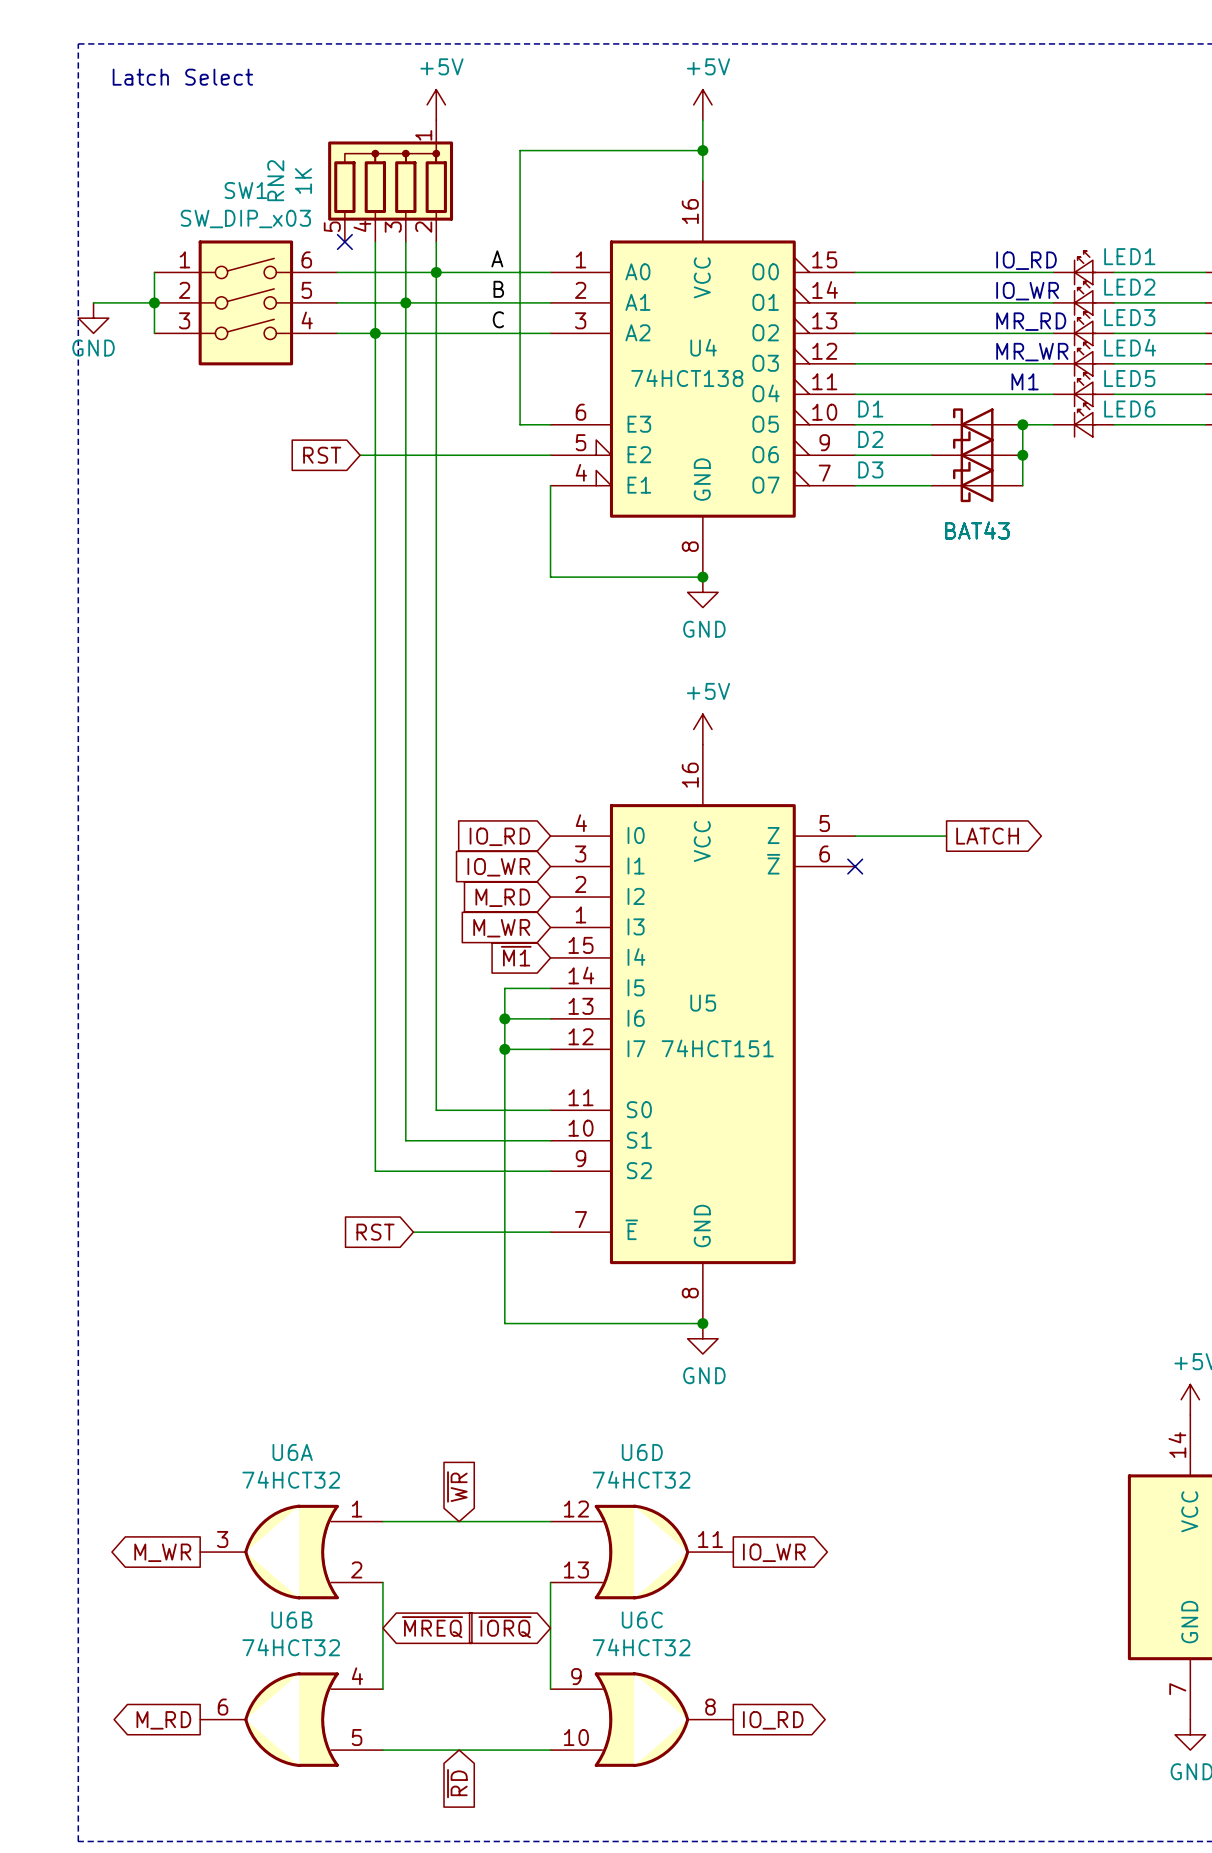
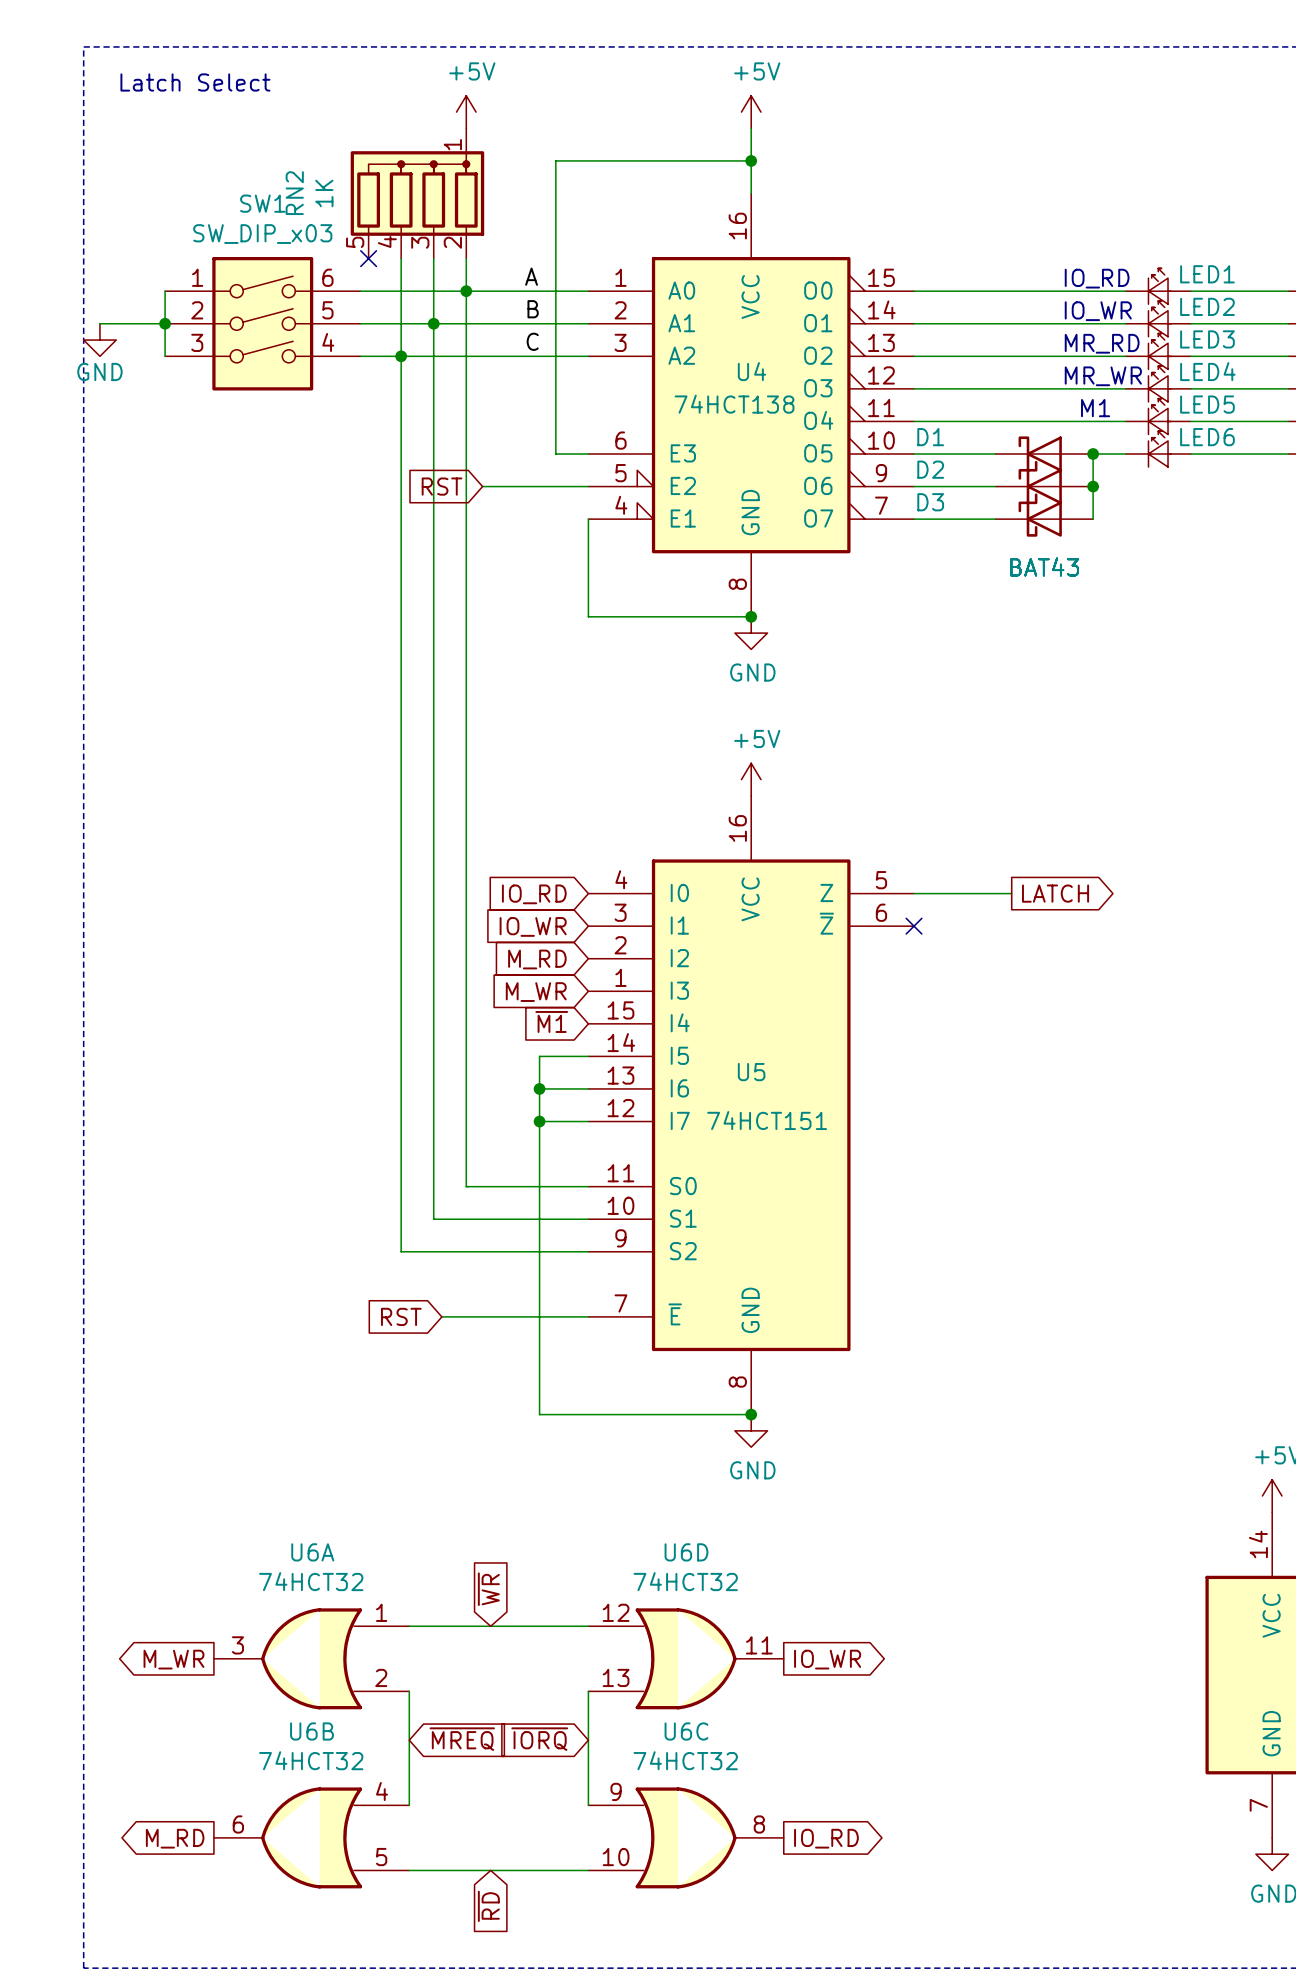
global label position: RST (322, 455) -> RST (442, 486)
wire: (360, 455) (451, 455) -> none

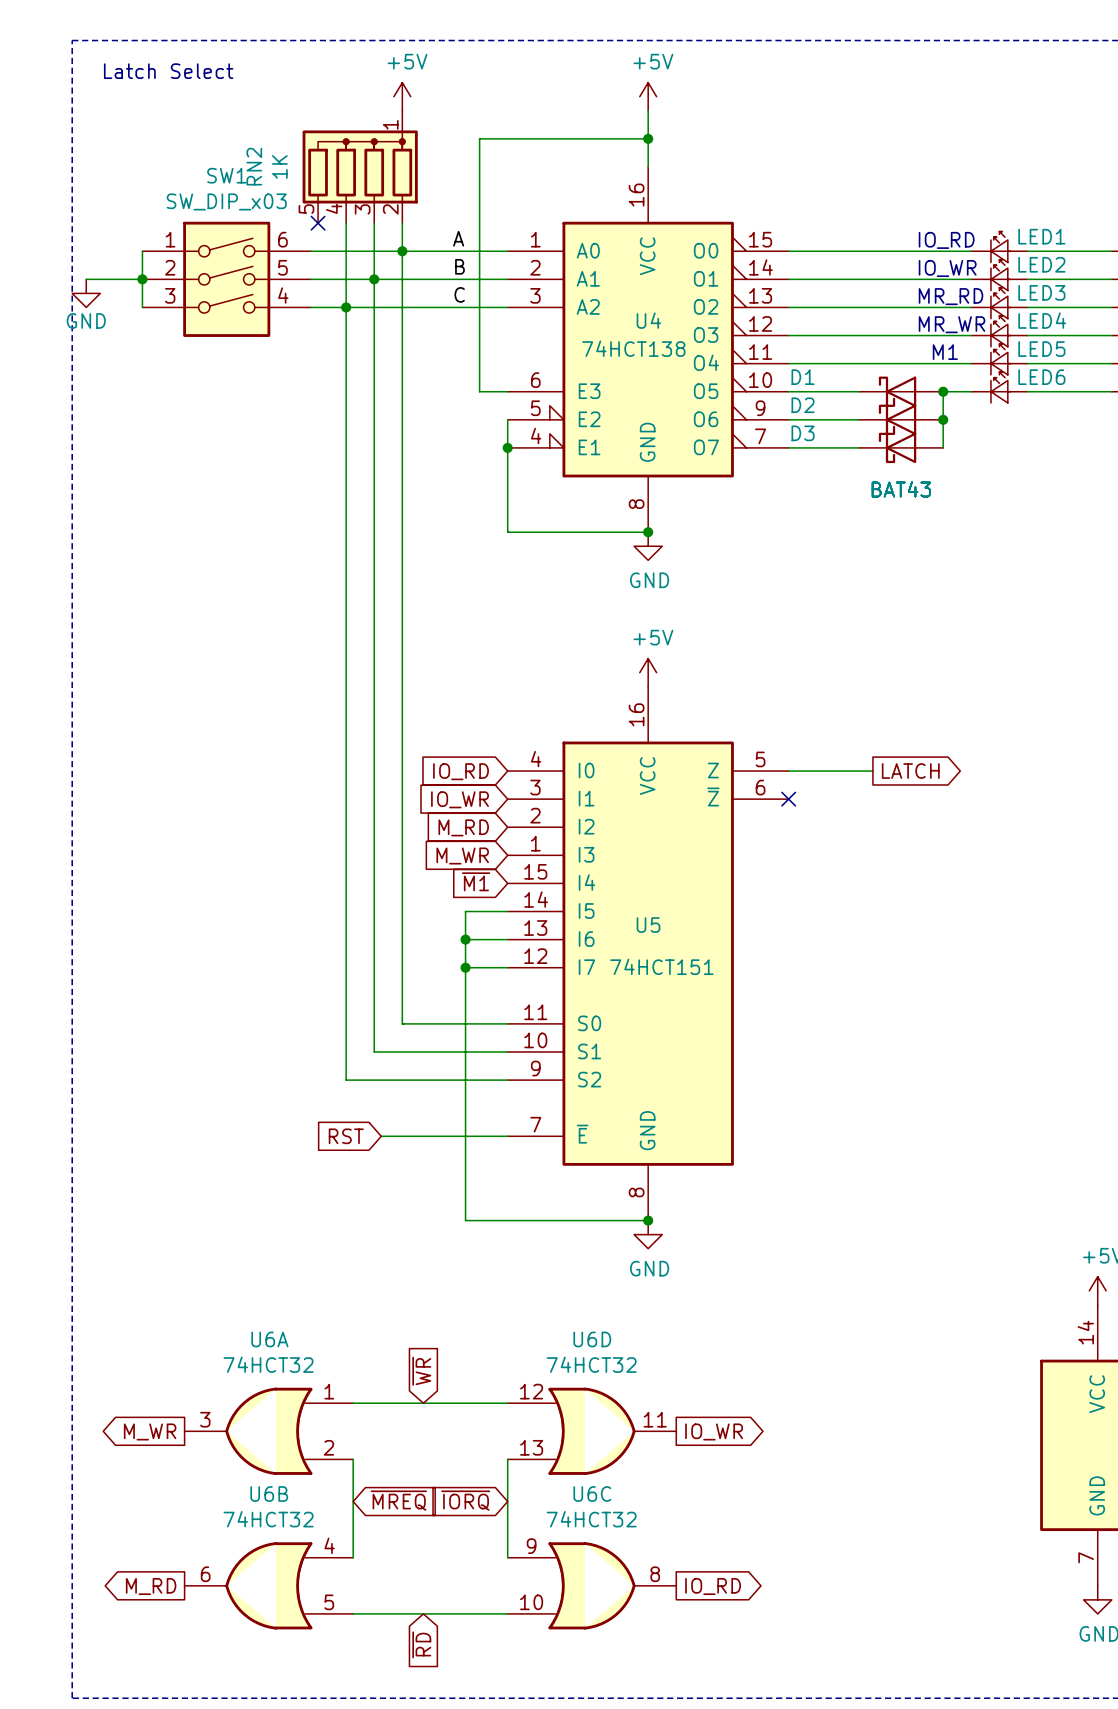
global label: RST (442, 486) -> none
wire: (482, 486) (588, 486) -> (507, 447) (507, 419)
junction: none -> (507, 447)

